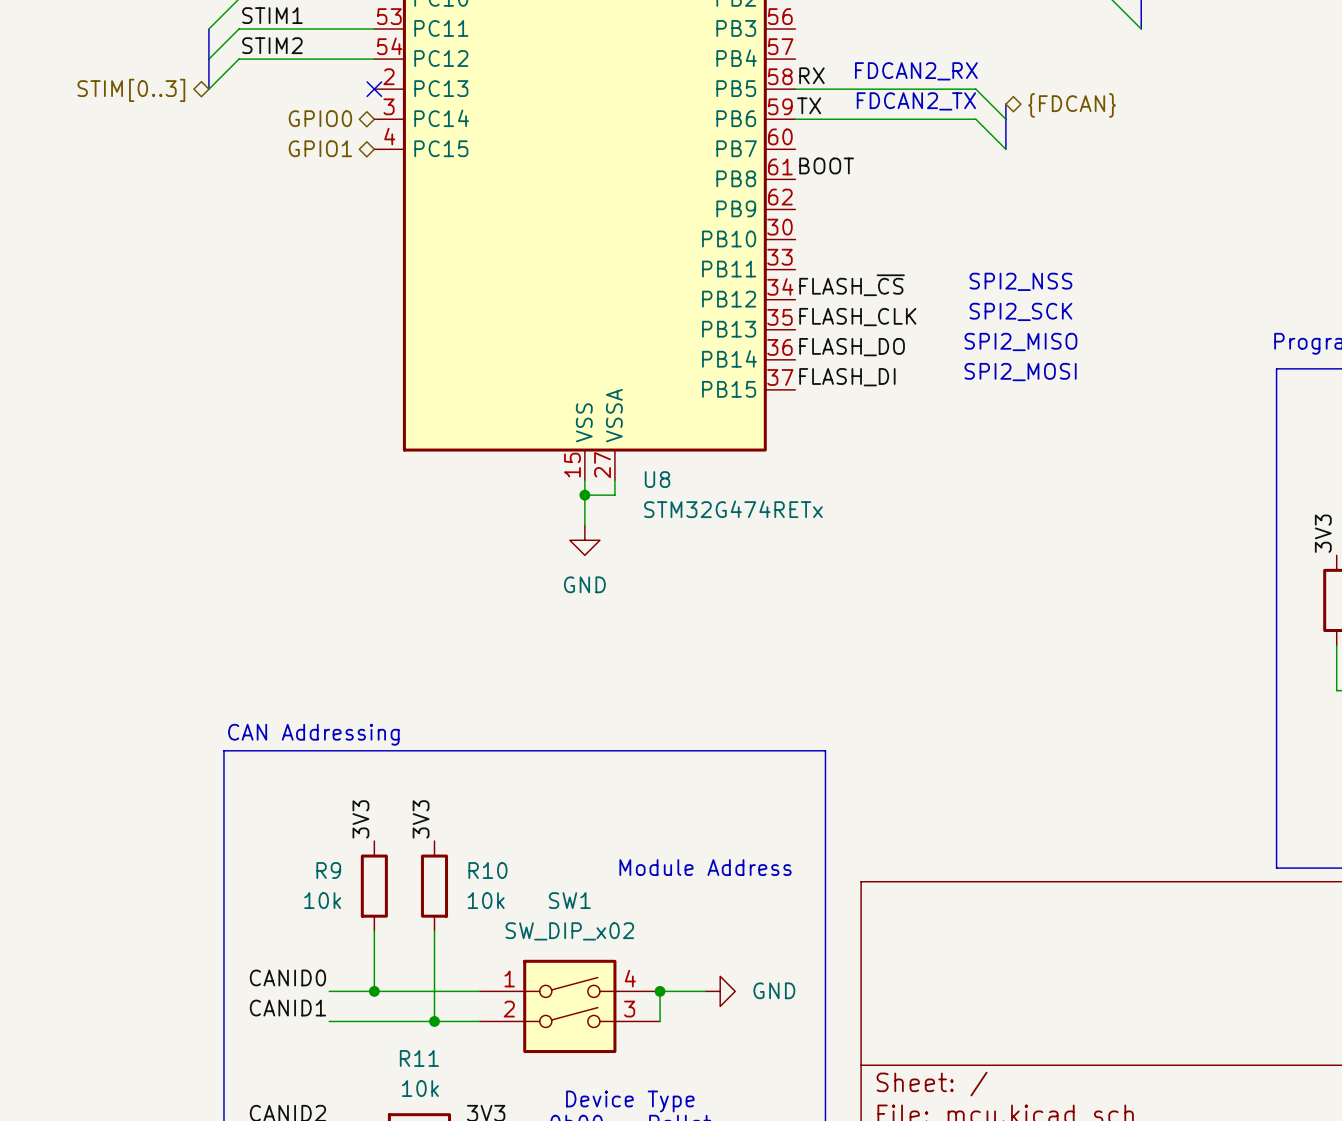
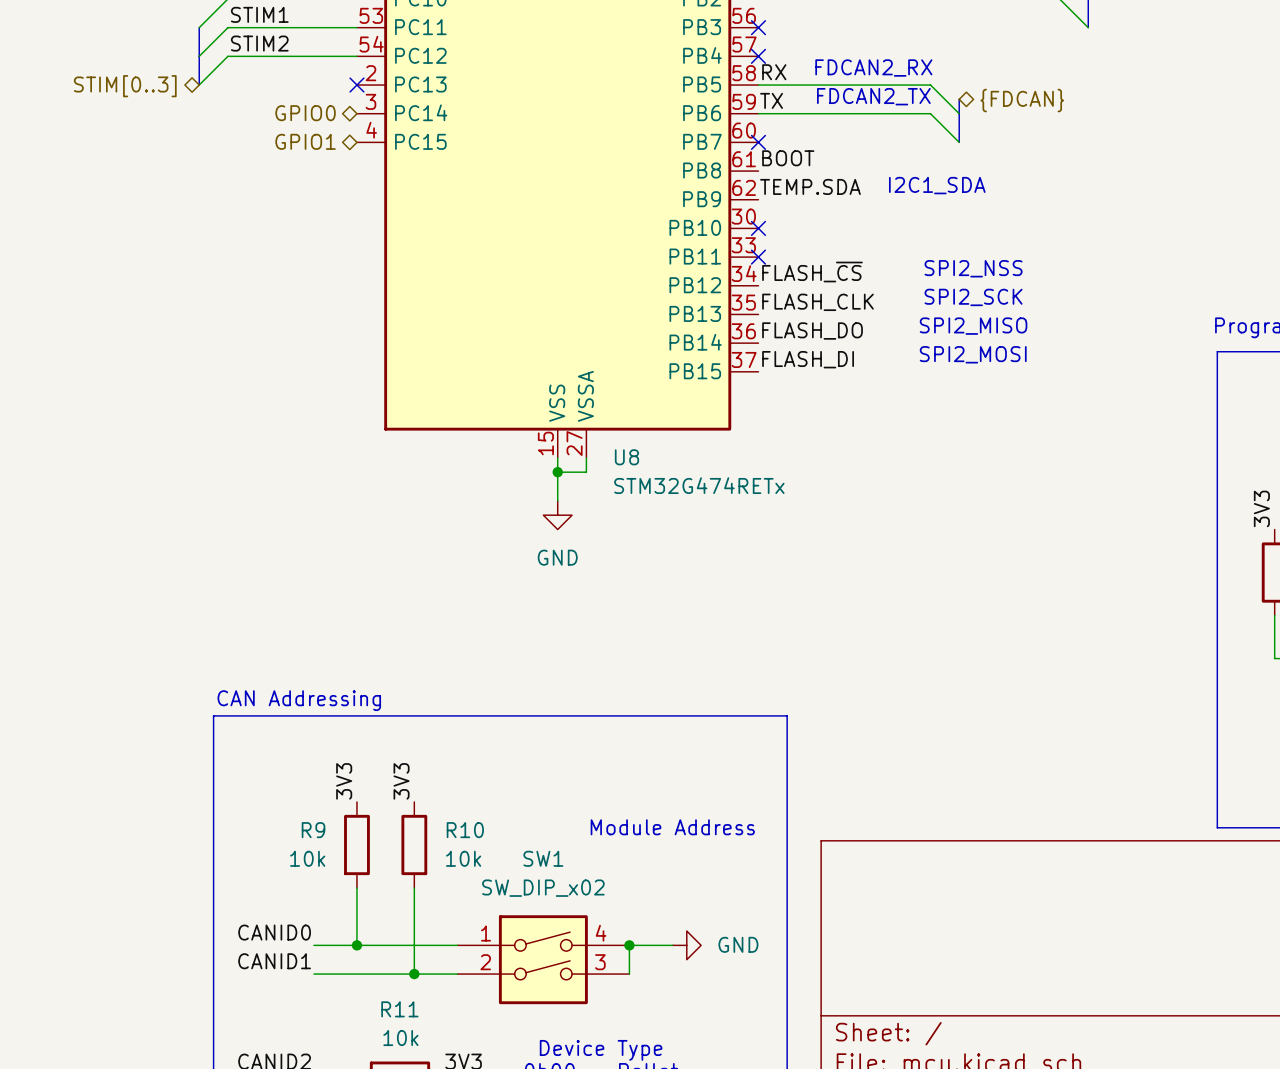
no-connect mark: none -> (758, 27)
no-connect mark: none -> (758, 56)
no-connect mark: none -> (758, 142)
text: none -> I2C1_SDA (937, 185)
label: none -> TEMP.SDA (810, 186)
no-connect mark: none -> (758, 228)
no-connect mark: none -> (758, 257)

